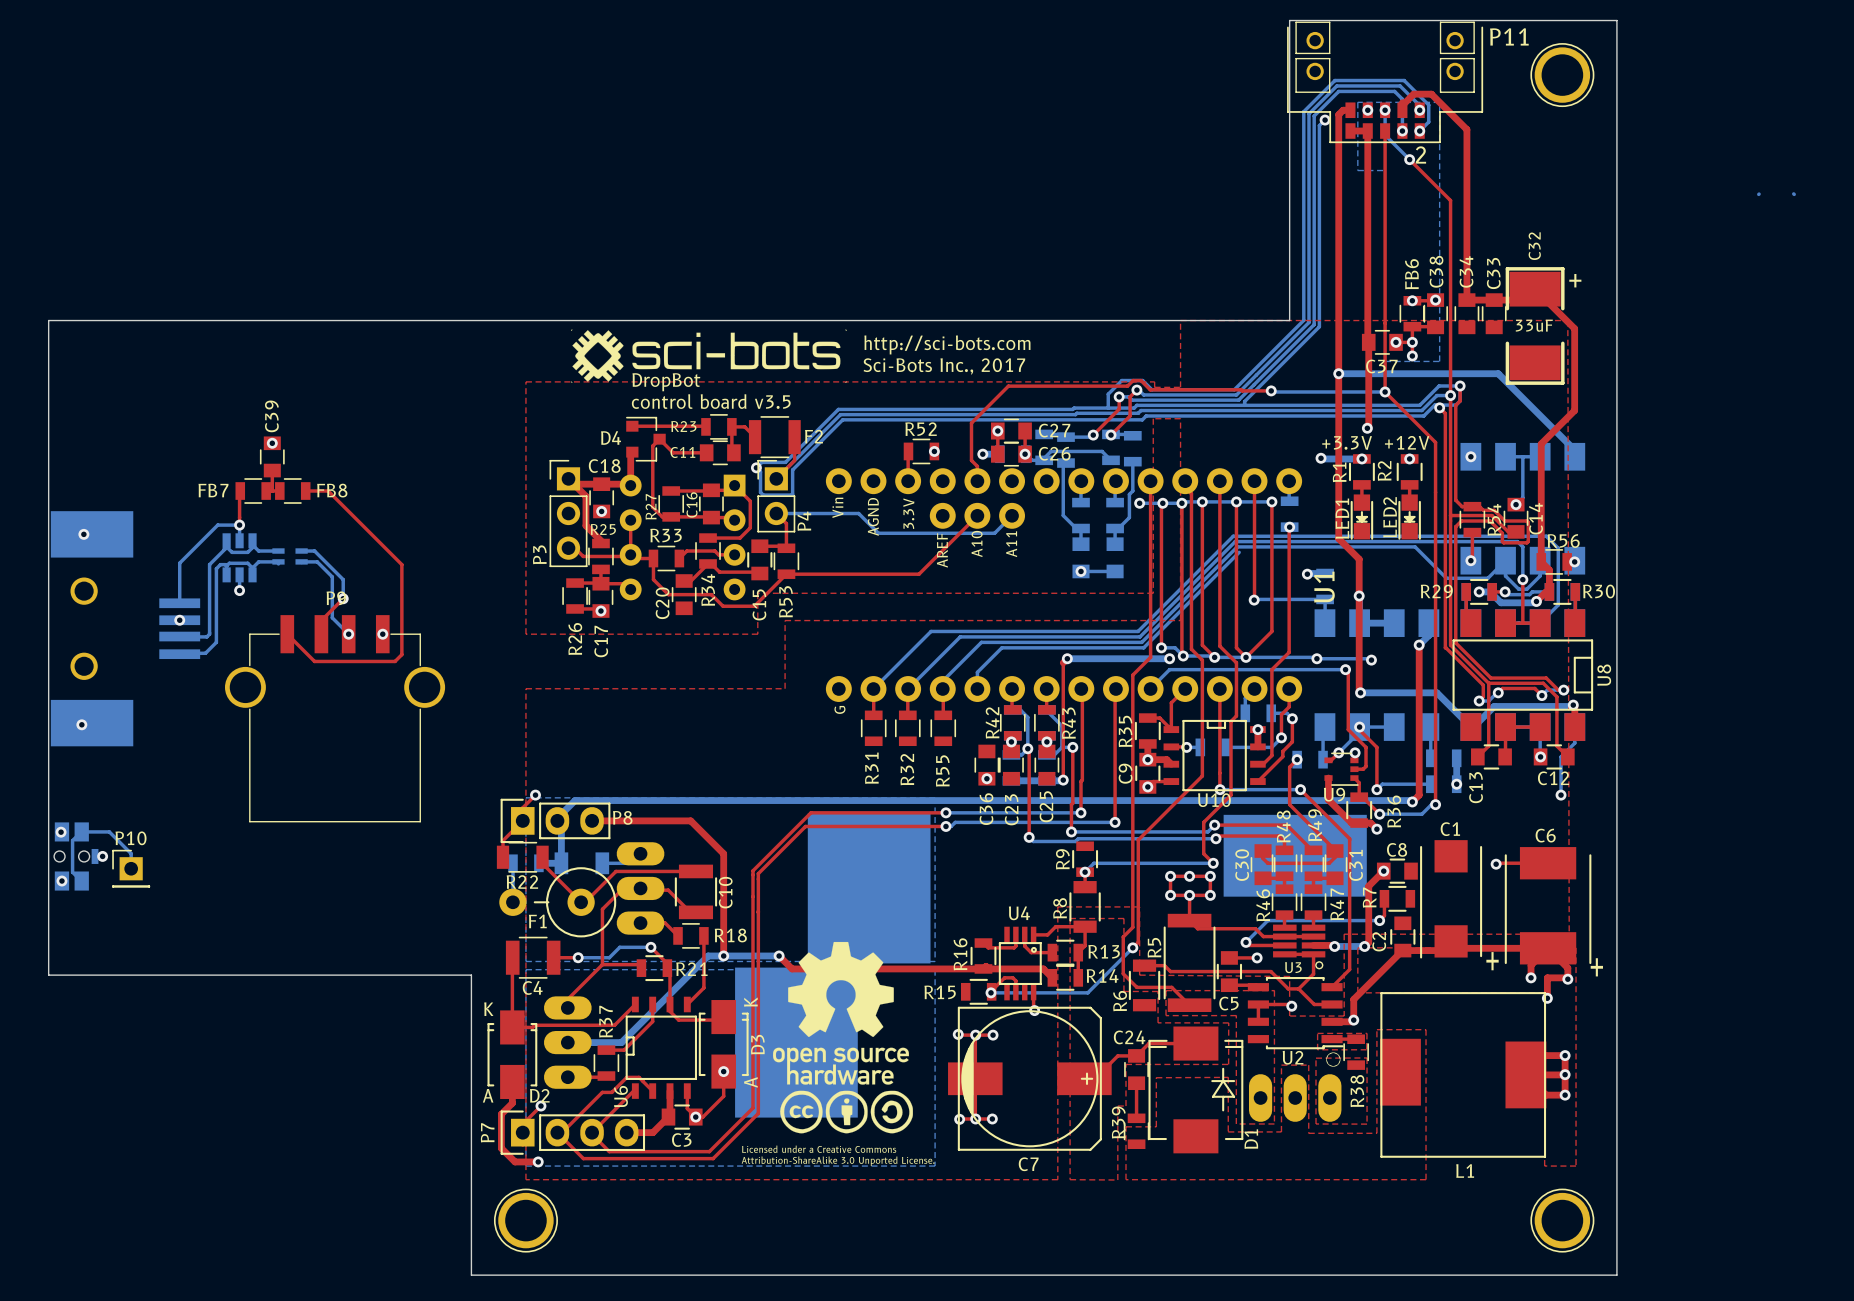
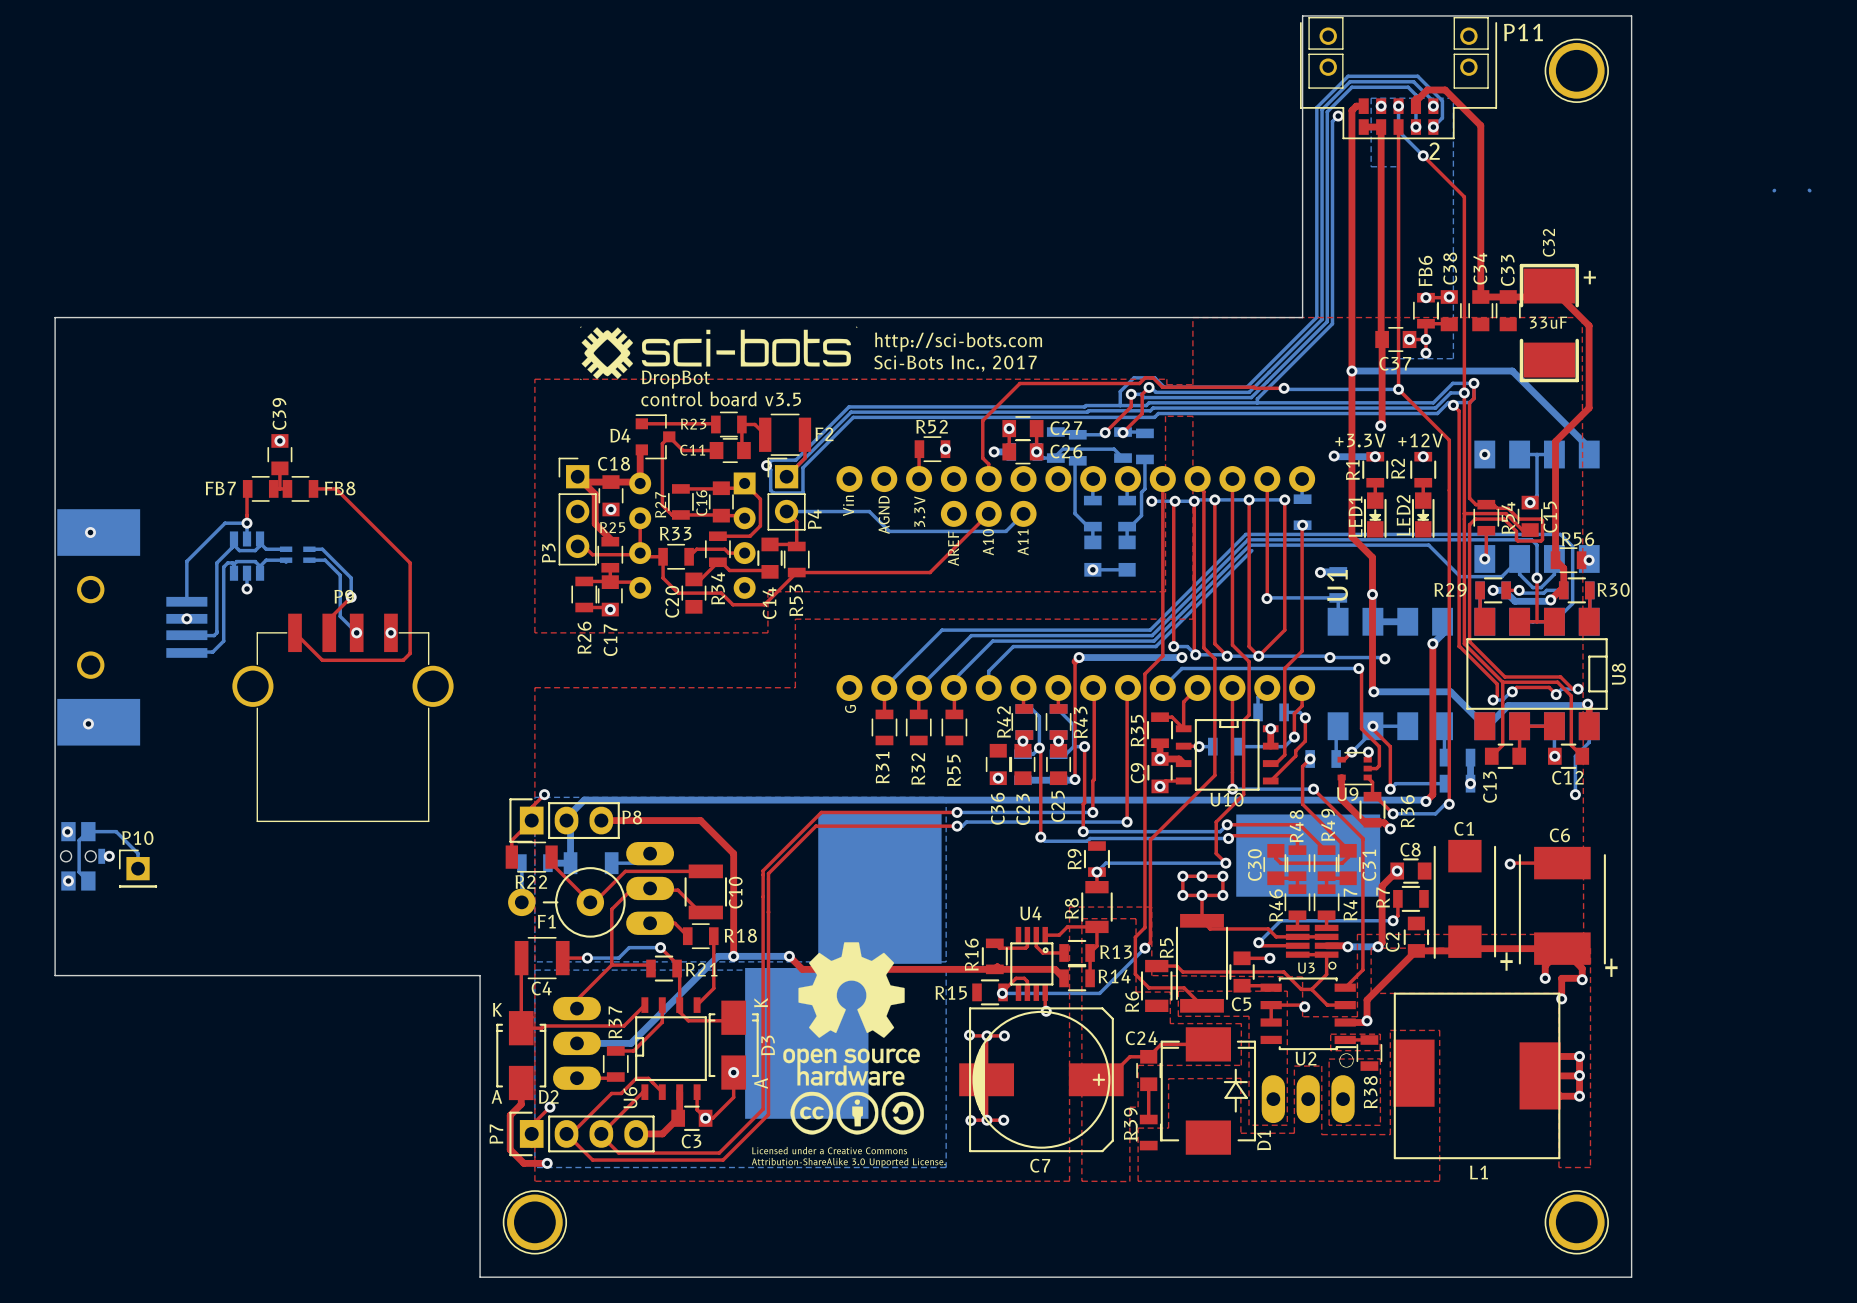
C14 name: C14 (1536, 518) -> C15 (1550, 517)
C15 name: C15 (759, 604) -> C14 (769, 603)

